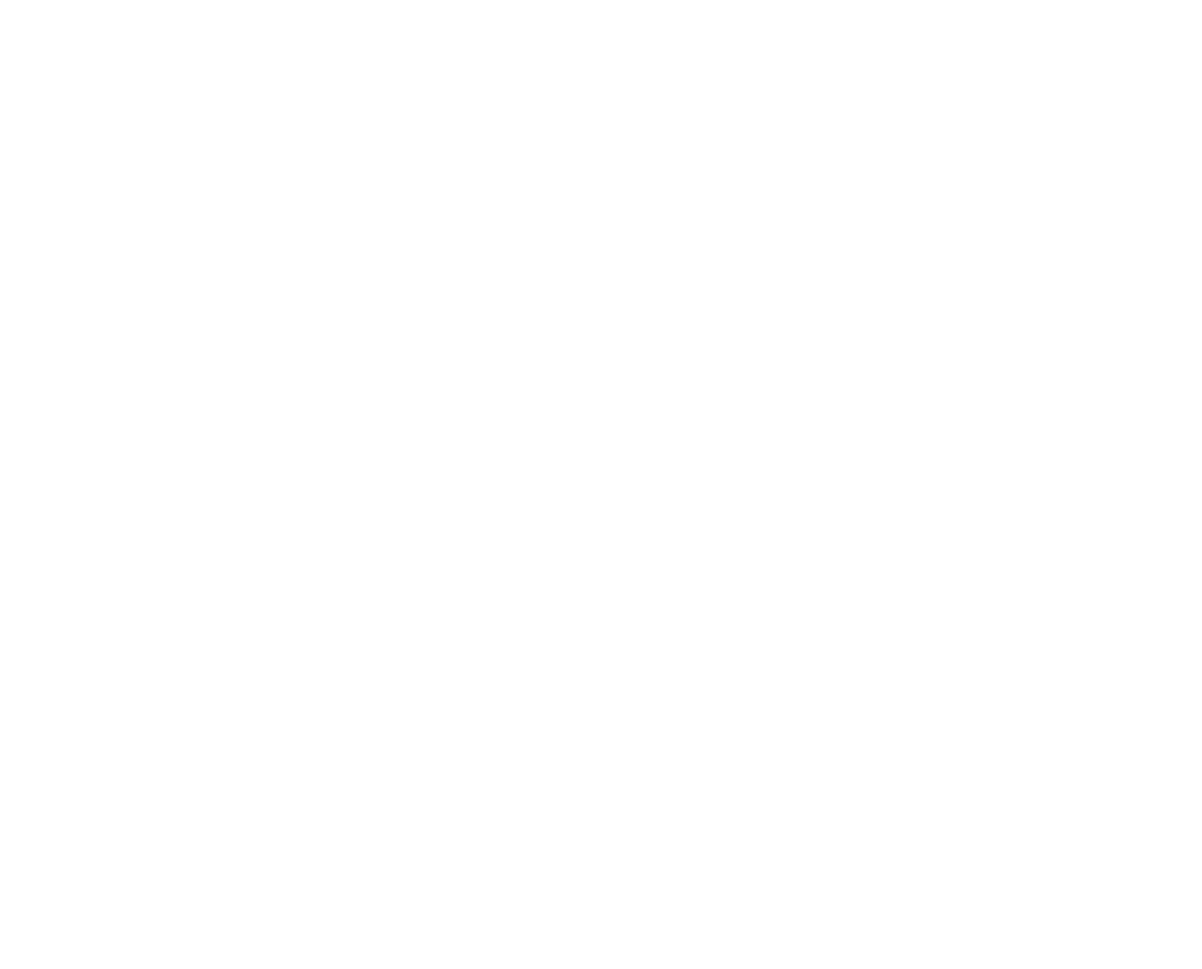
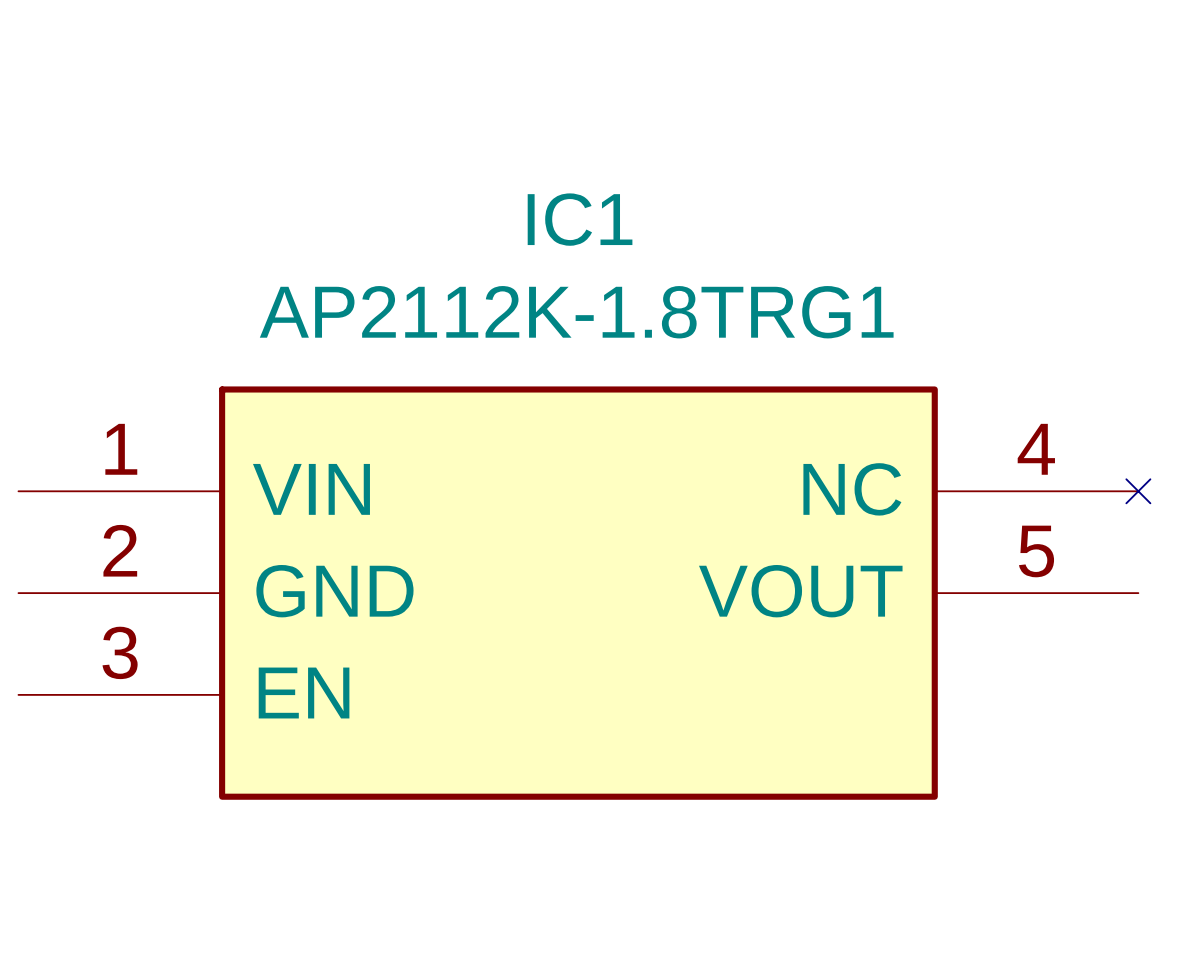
IC1: none -> AP2112K-1.8TRG1 (584, 593)

